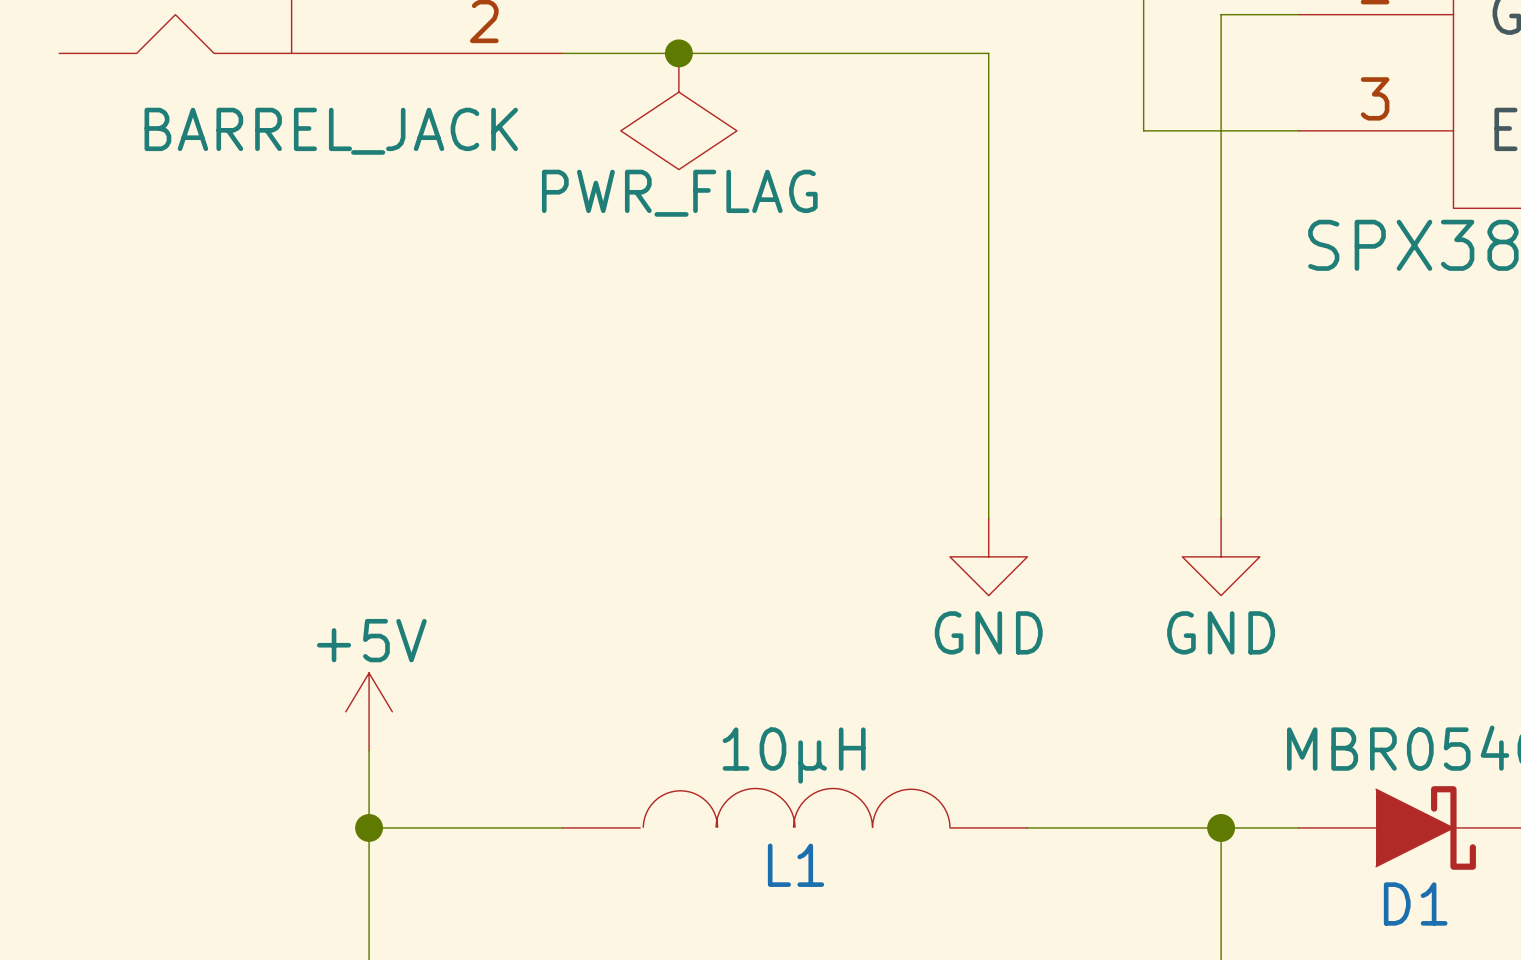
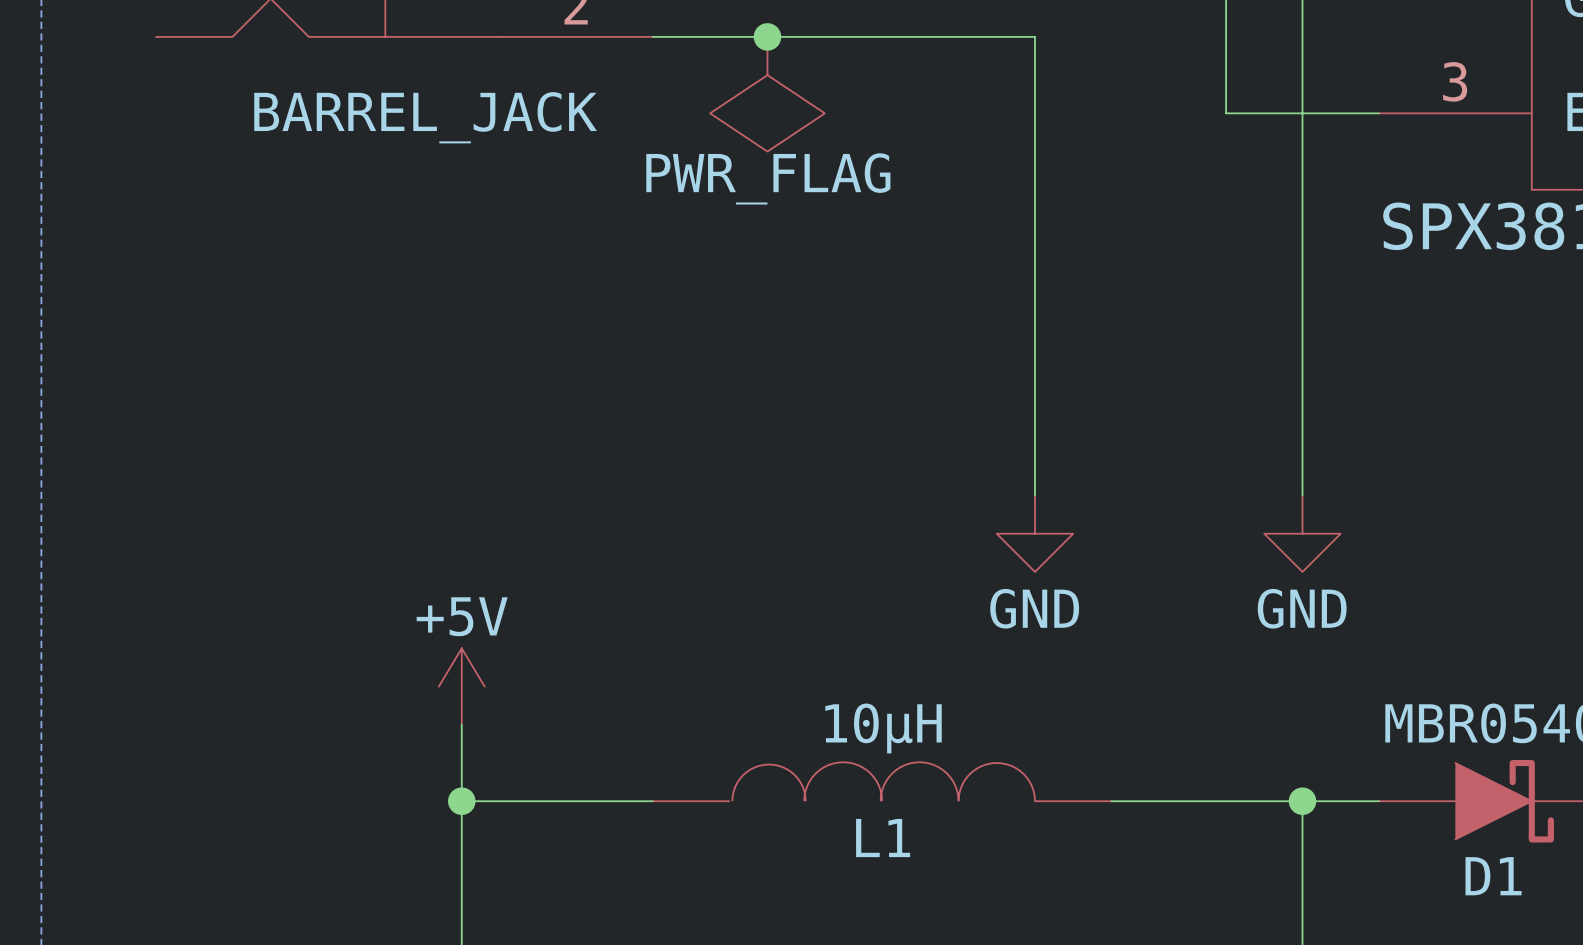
wire: (950, 53) (988, 53) (988, 518) -> (1034, 36) (1034, 495)
power symbol position: GND (988, 556) -> GND (1034, 533)

